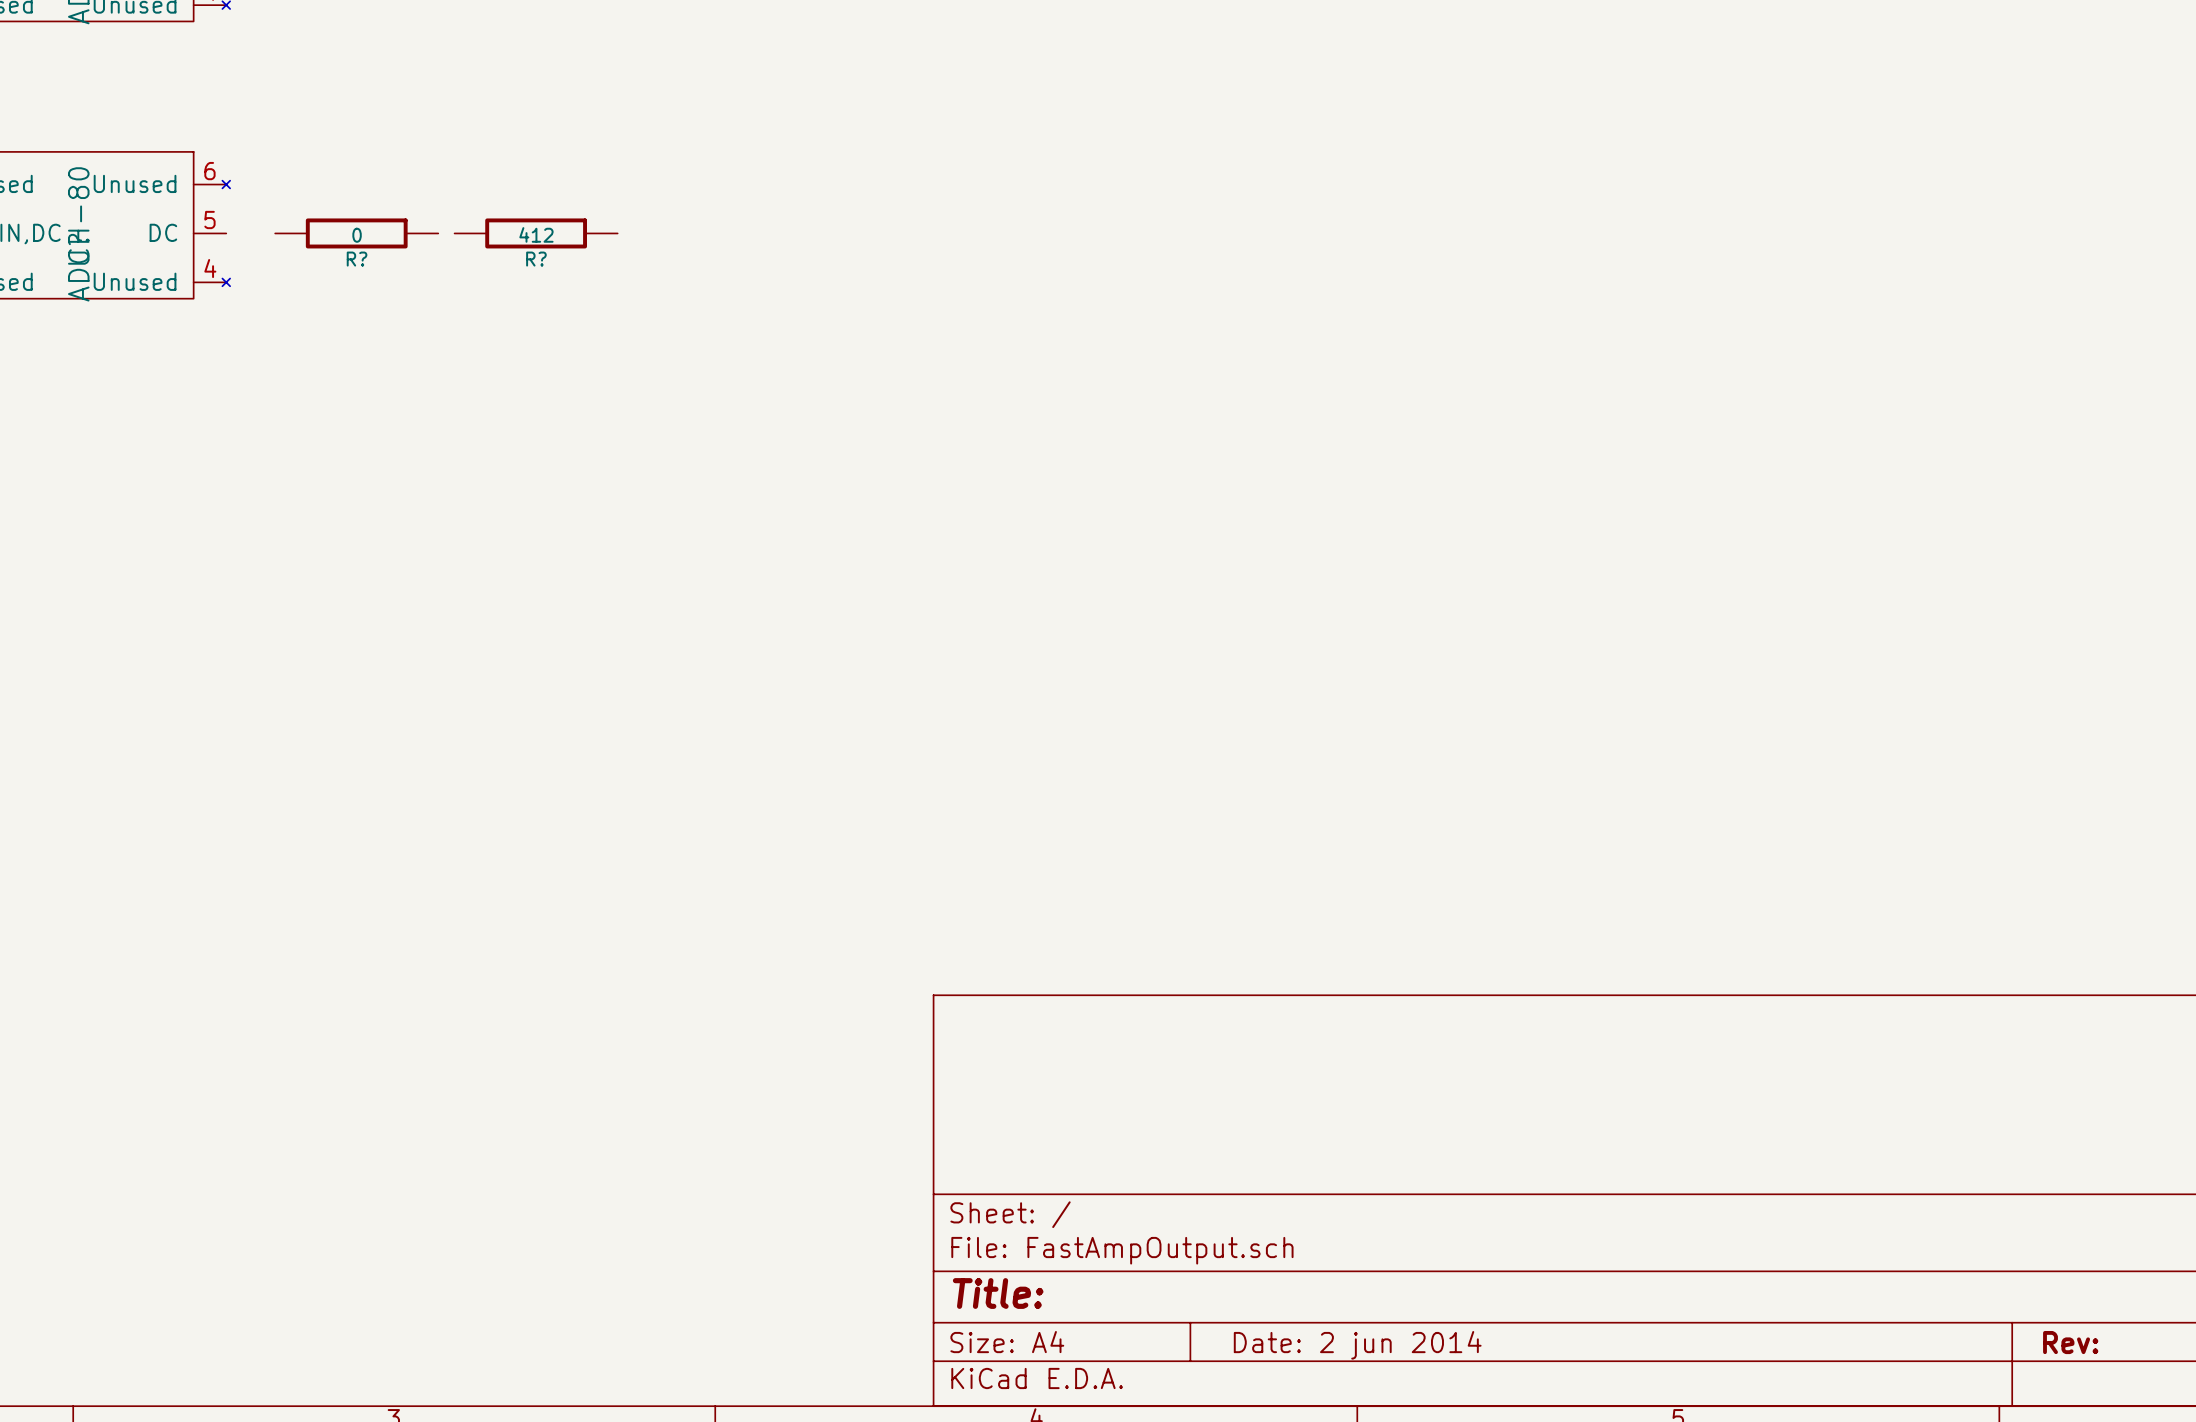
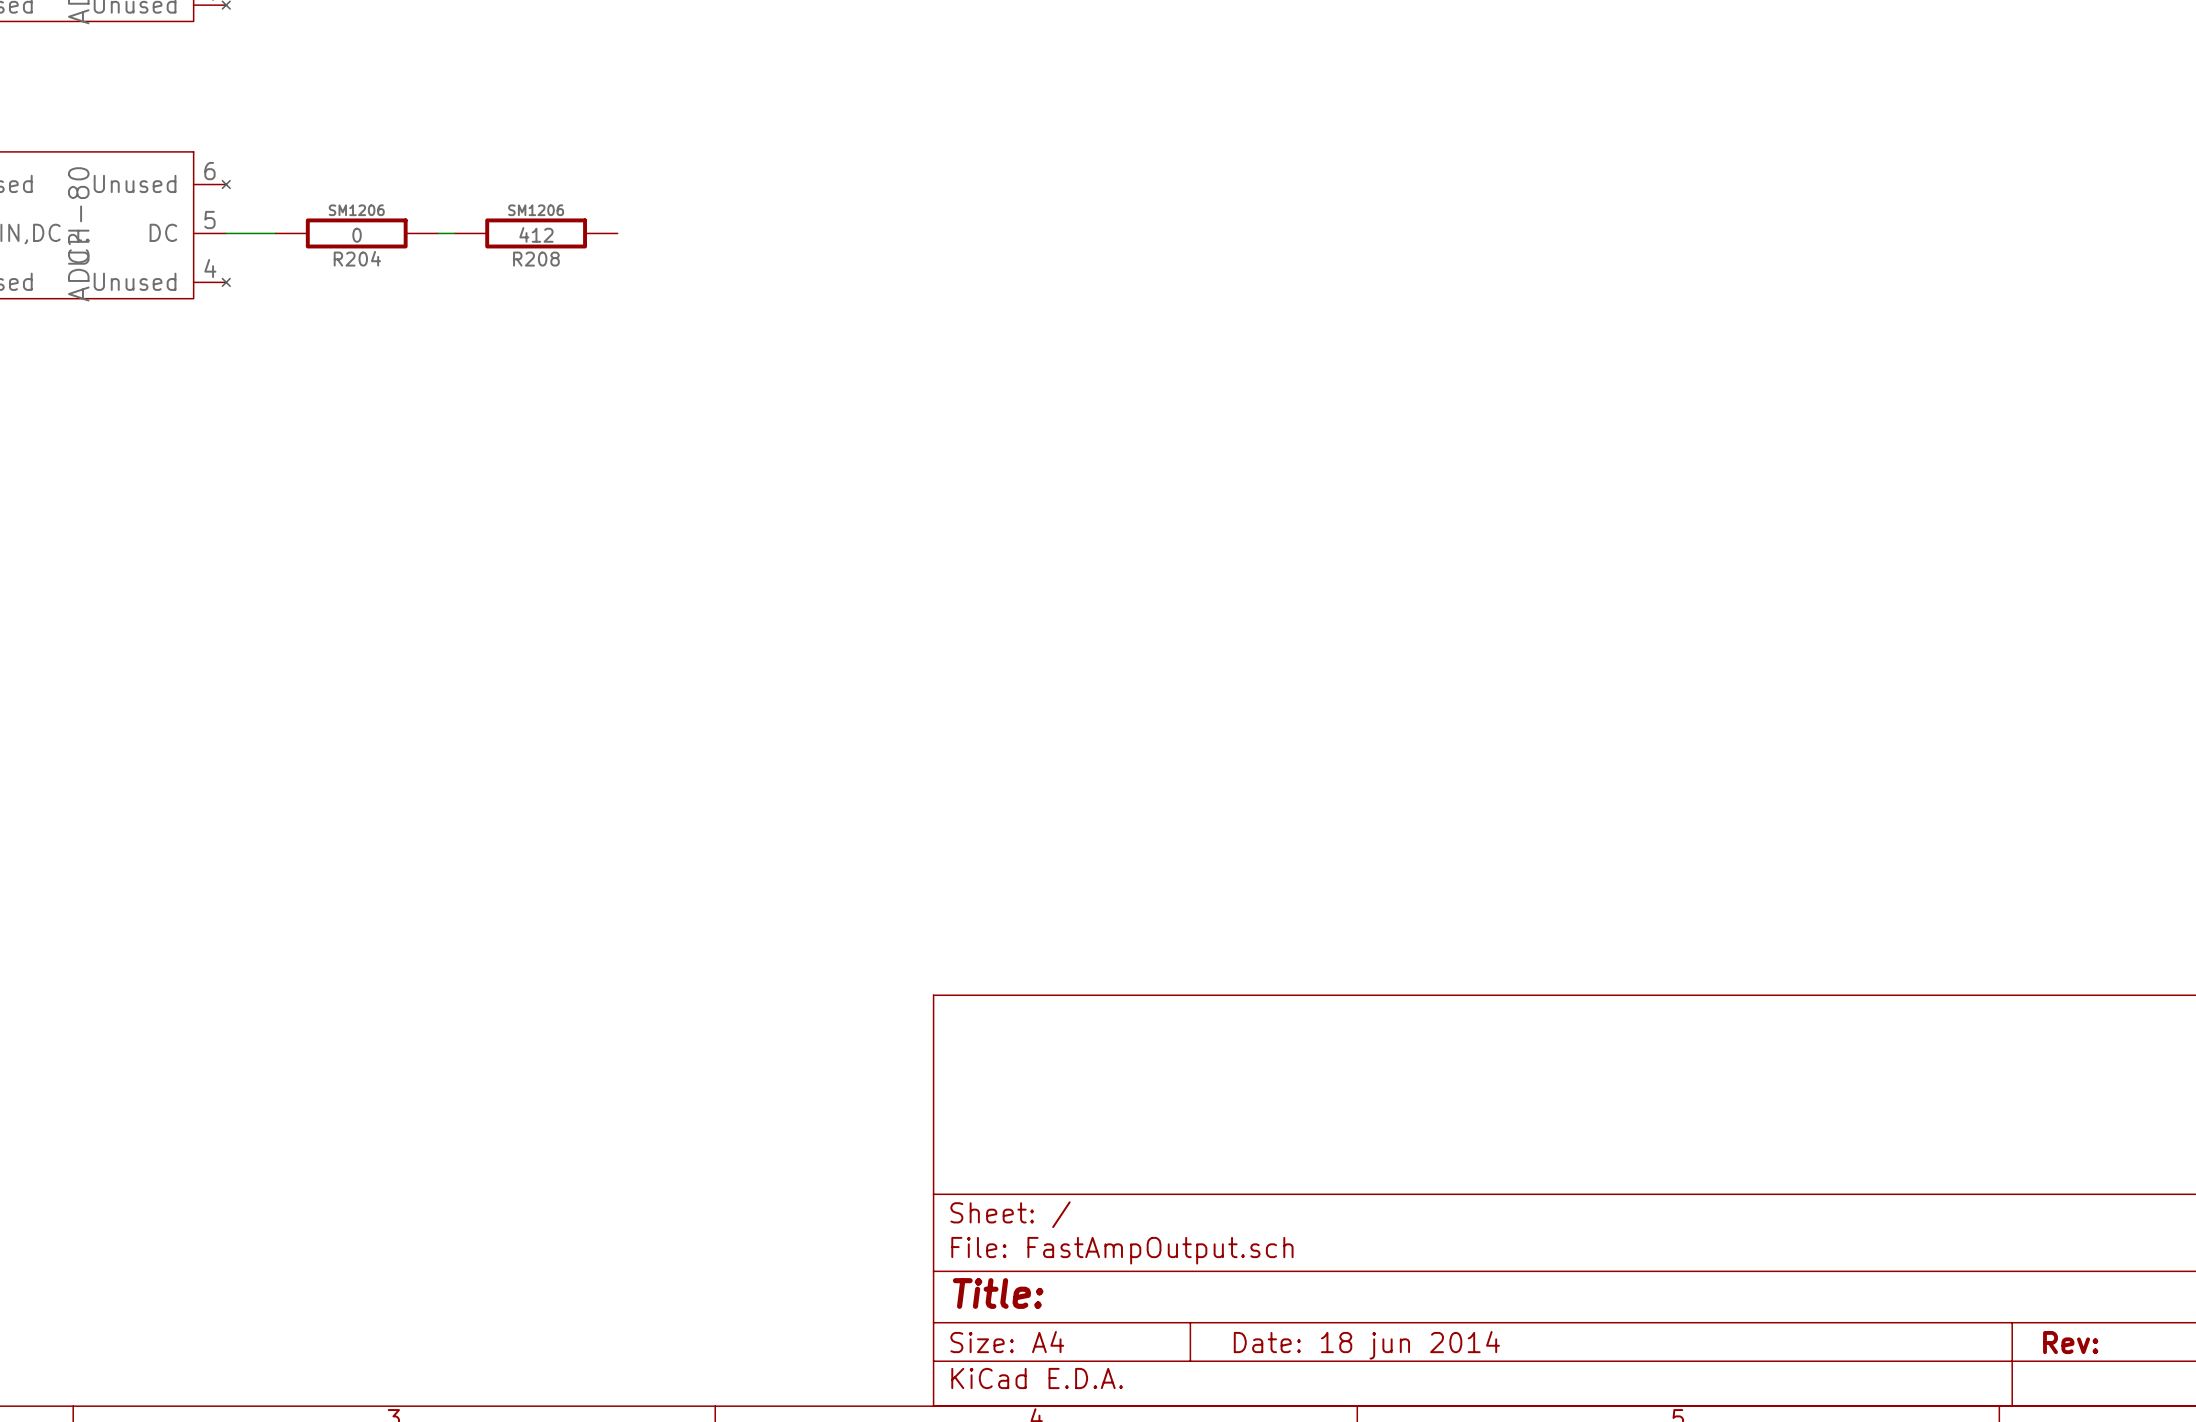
R? text: none -> SM1206 (356, 210)
R? text: none -> SM1206 (536, 210)
wire: none -> (226, 233) (275, 233)
wire: none -> (438, 233) (454, 233)
R? name: R? (357, 259) -> R204 (357, 258)
R? name: R? (536, 259) -> R208 (536, 259)
title block: Date: 2 jun 2014 (1357, 1345) -> Date: 18 jun 2014 (1366, 1345)

